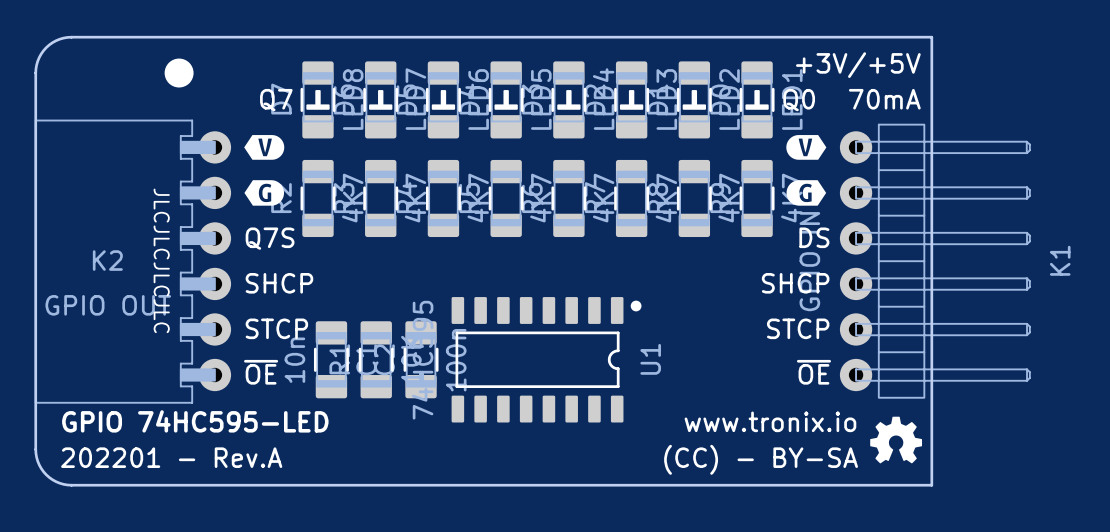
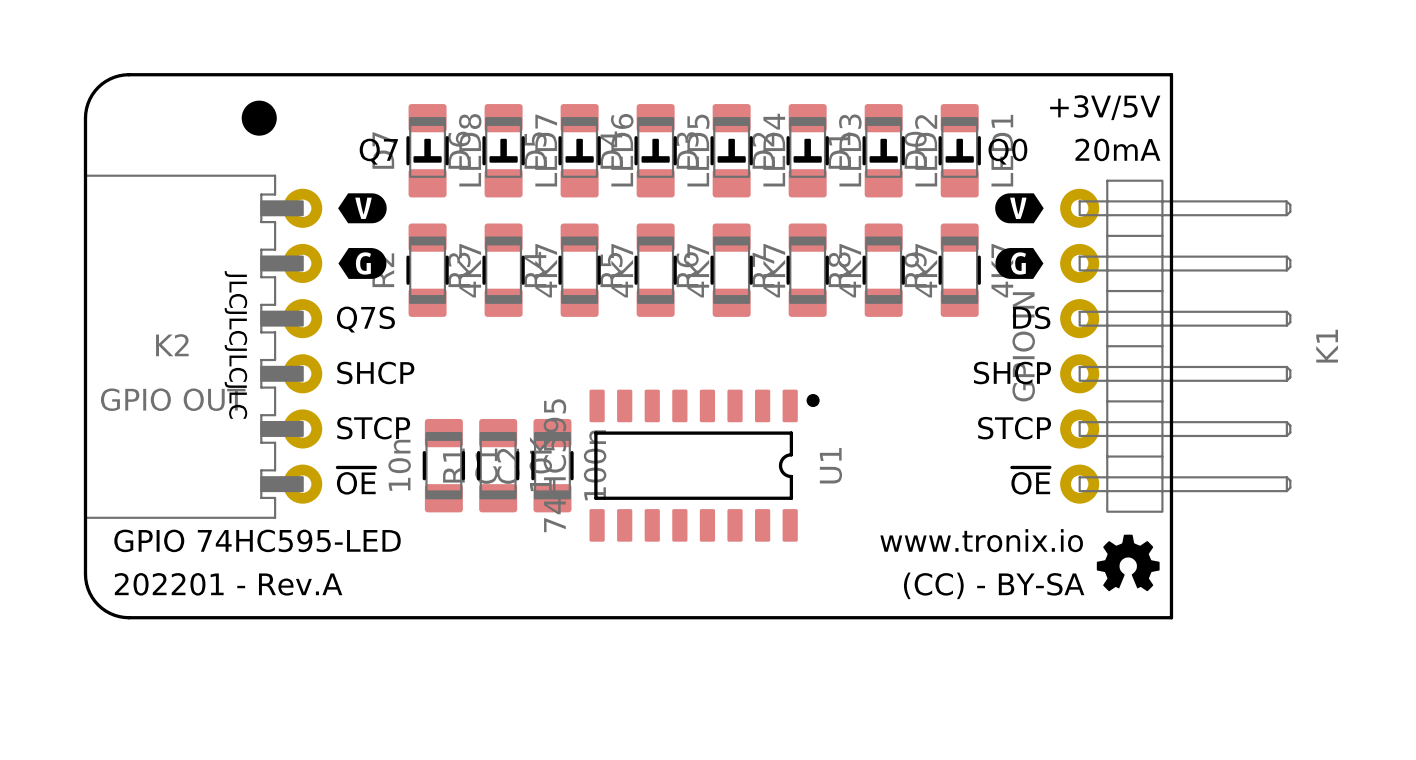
text: +3V/+5V (858, 65) -> +3V/5V (1105, 107)
text: 70mA (884, 99) -> 20mA (1117, 149)

